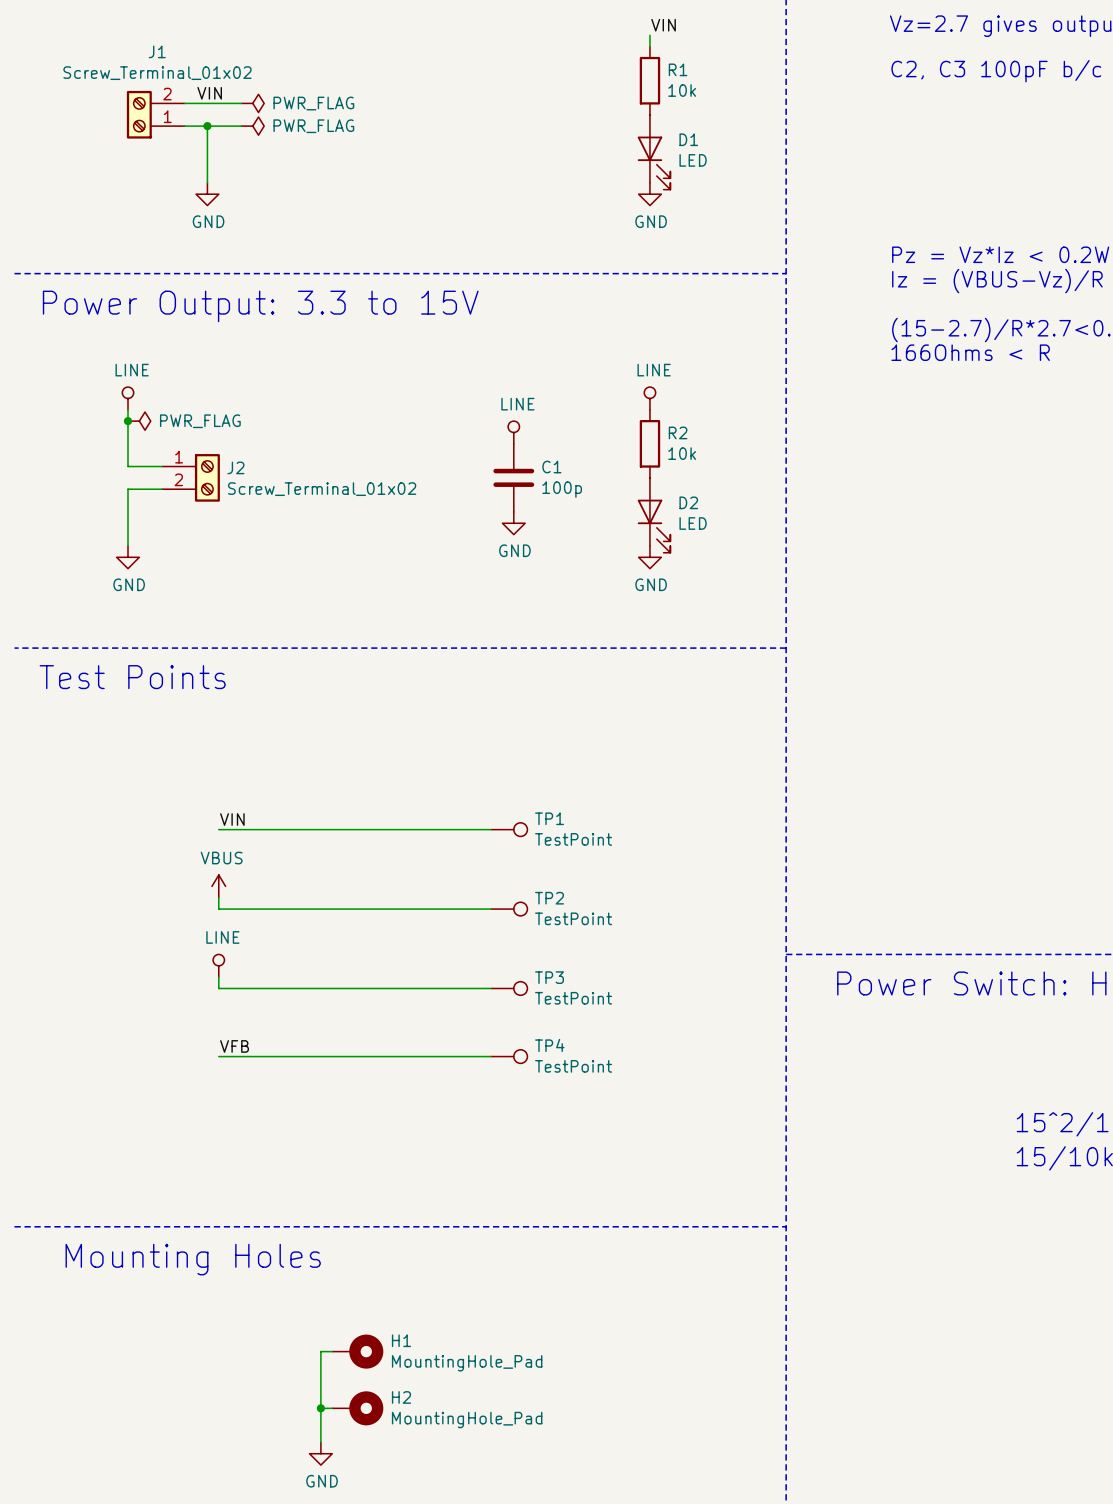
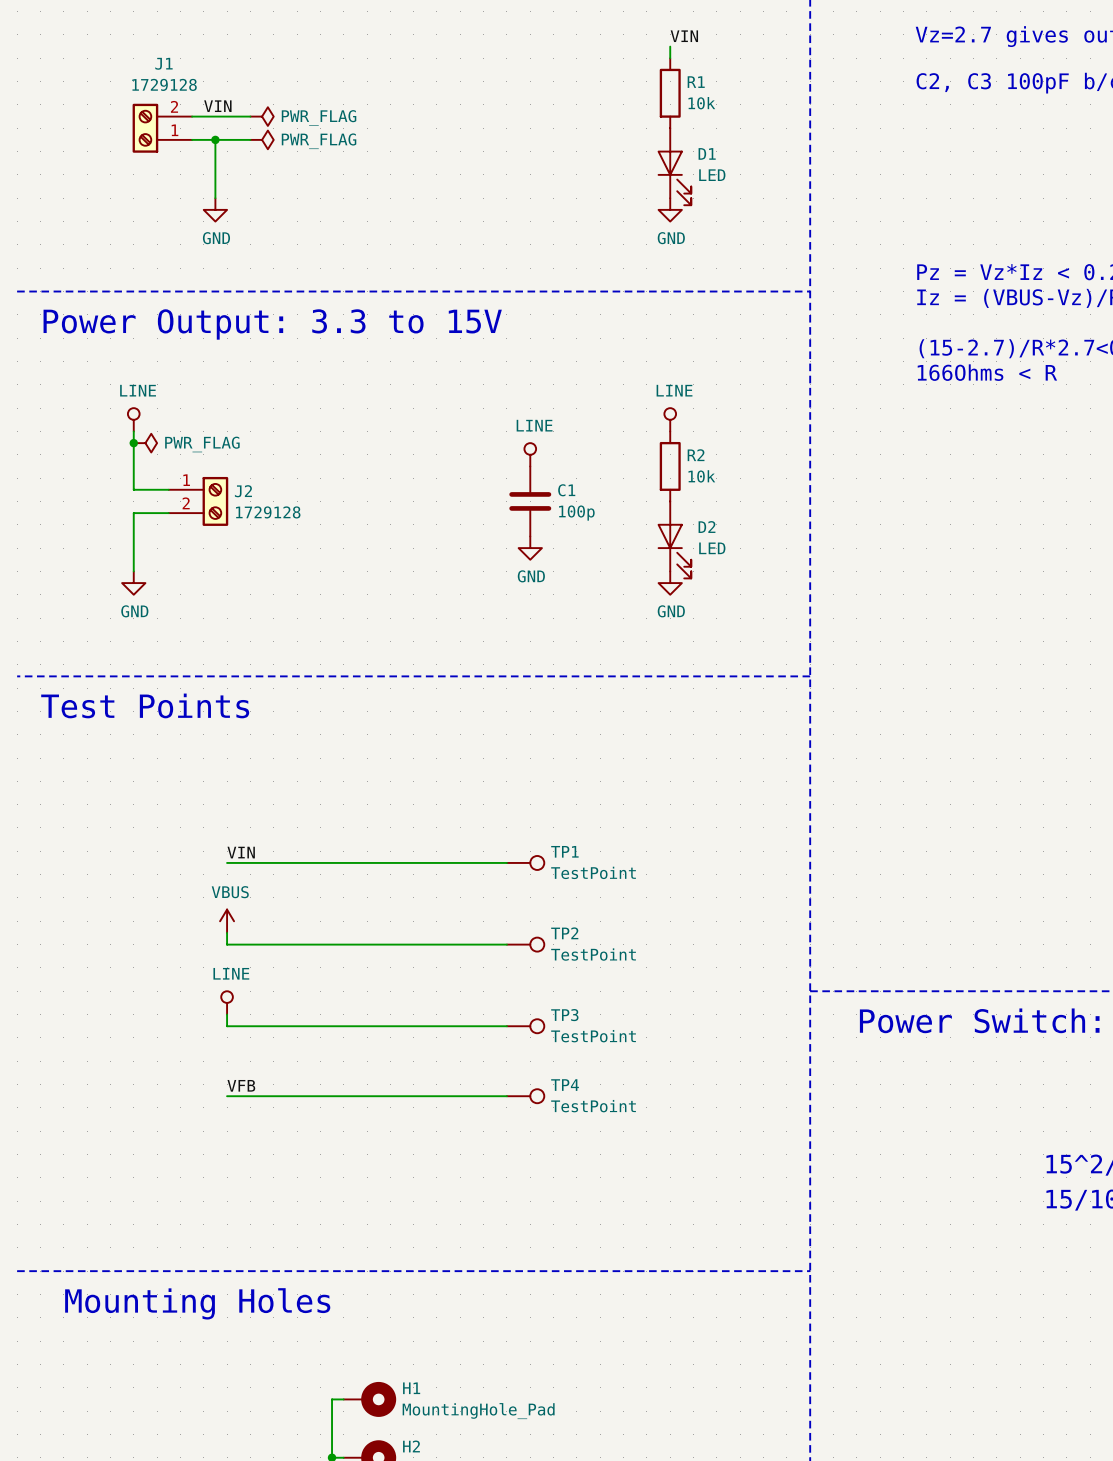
J1 value: Screw_Terminal_01x02 (157, 73) -> 1729128 (164, 84)
J2 value: Screw_Terminal_01x02 (322, 489) -> 1729128 (268, 512)

